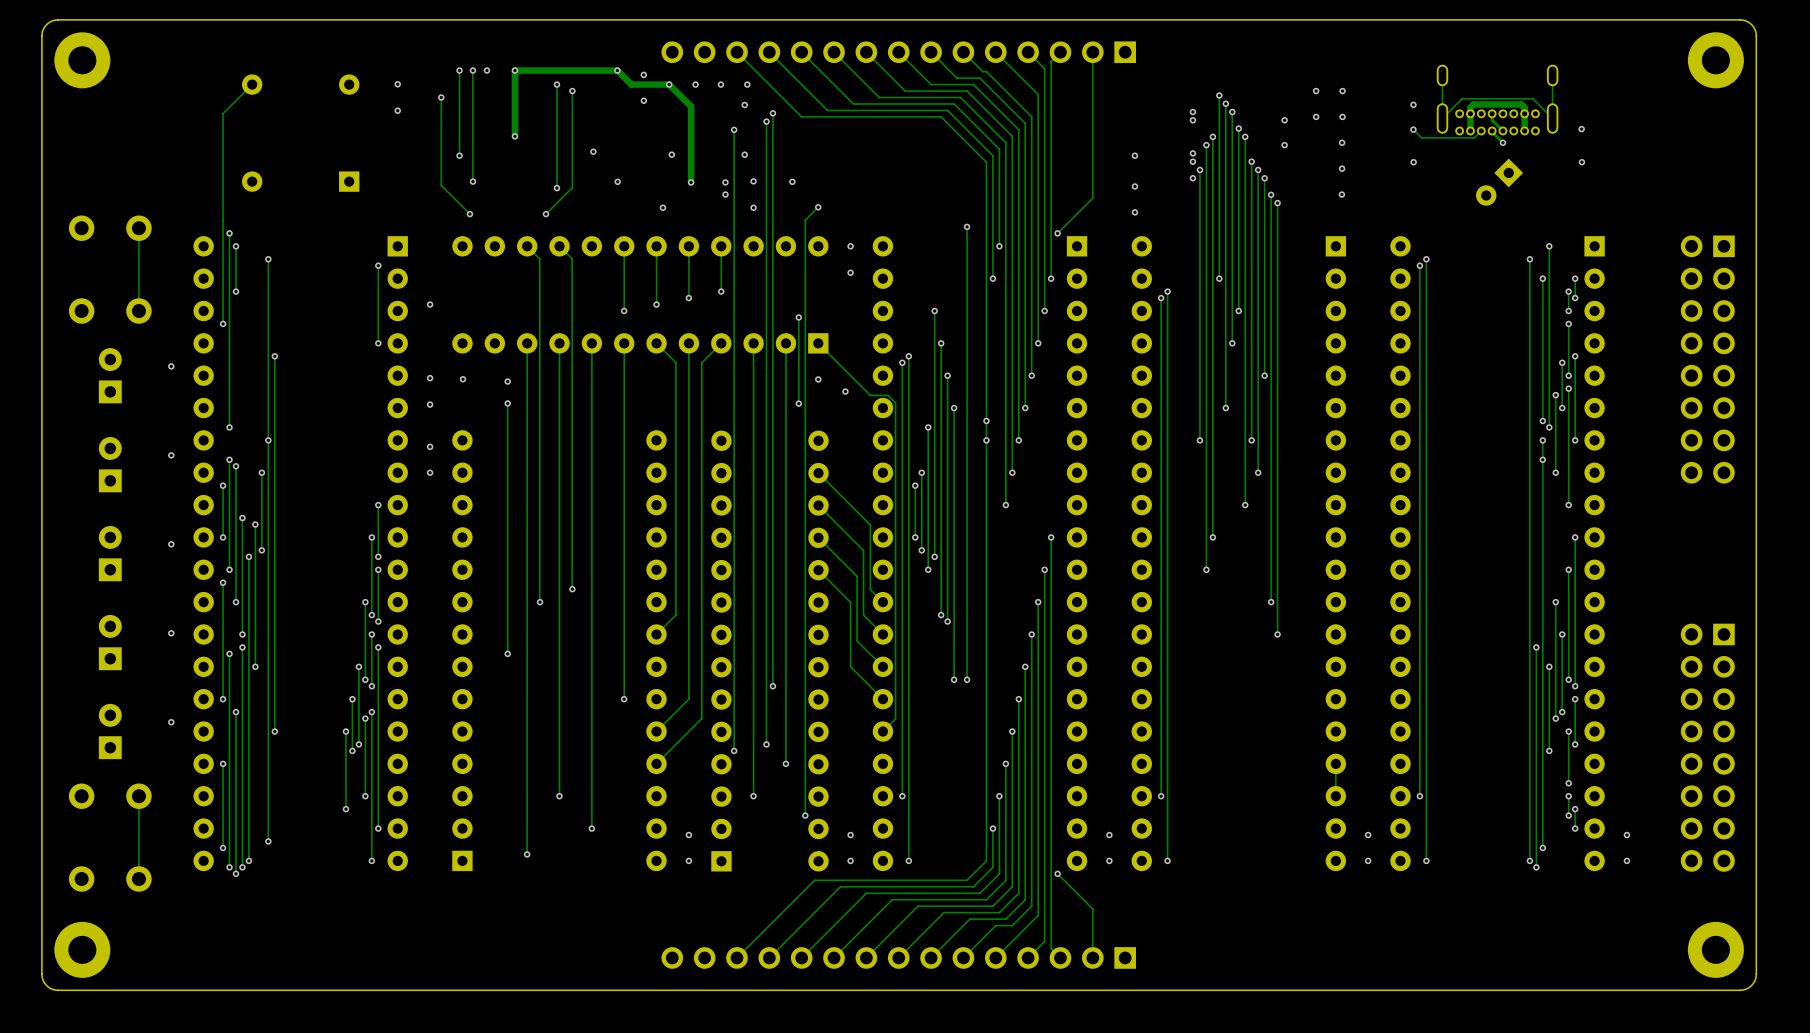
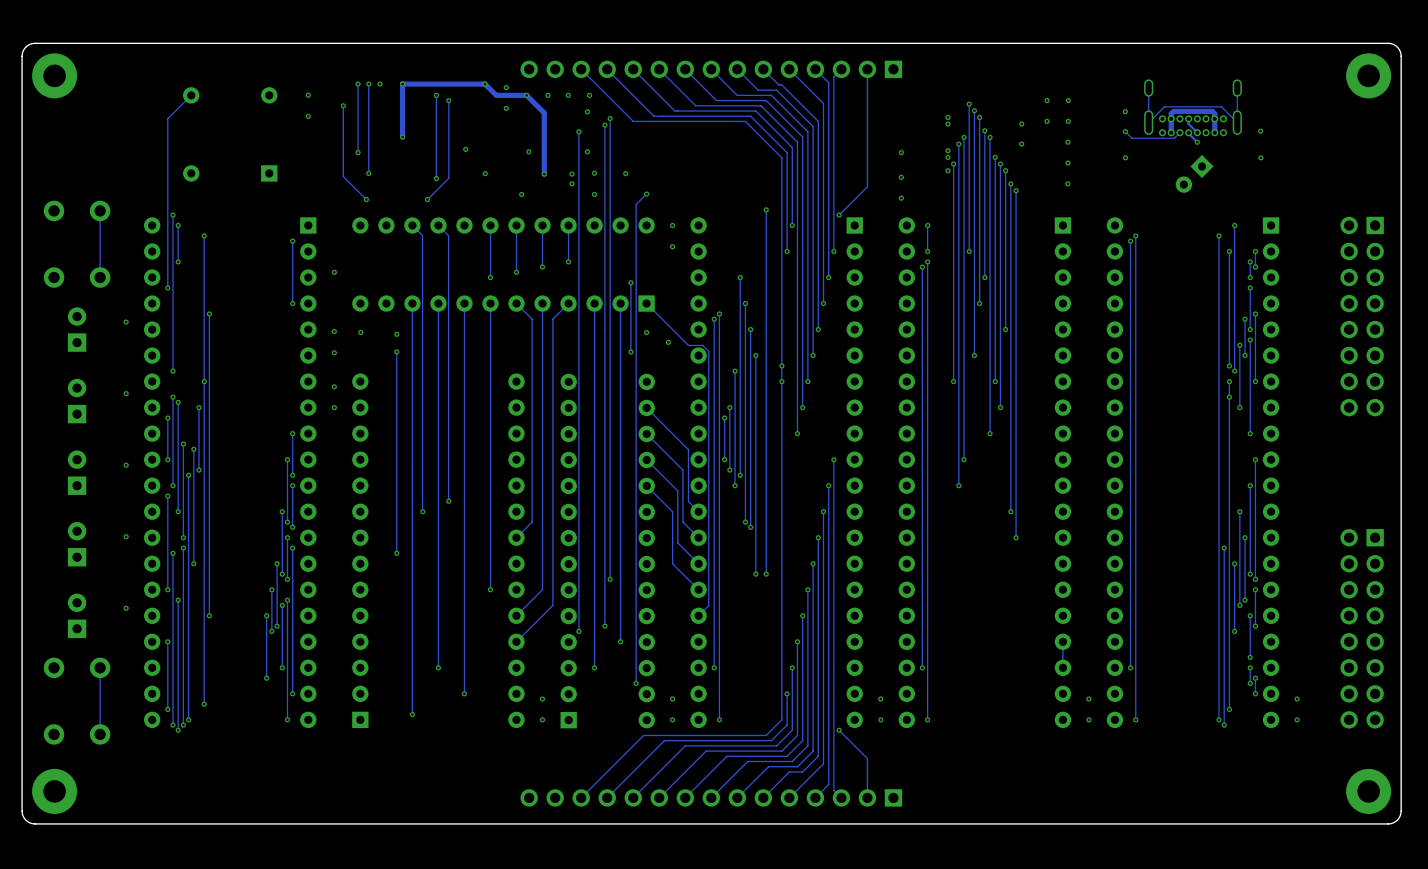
track: none -> (927, 225) (927, 251)
via: none -> (927, 225)
via: none -> (927, 251)

